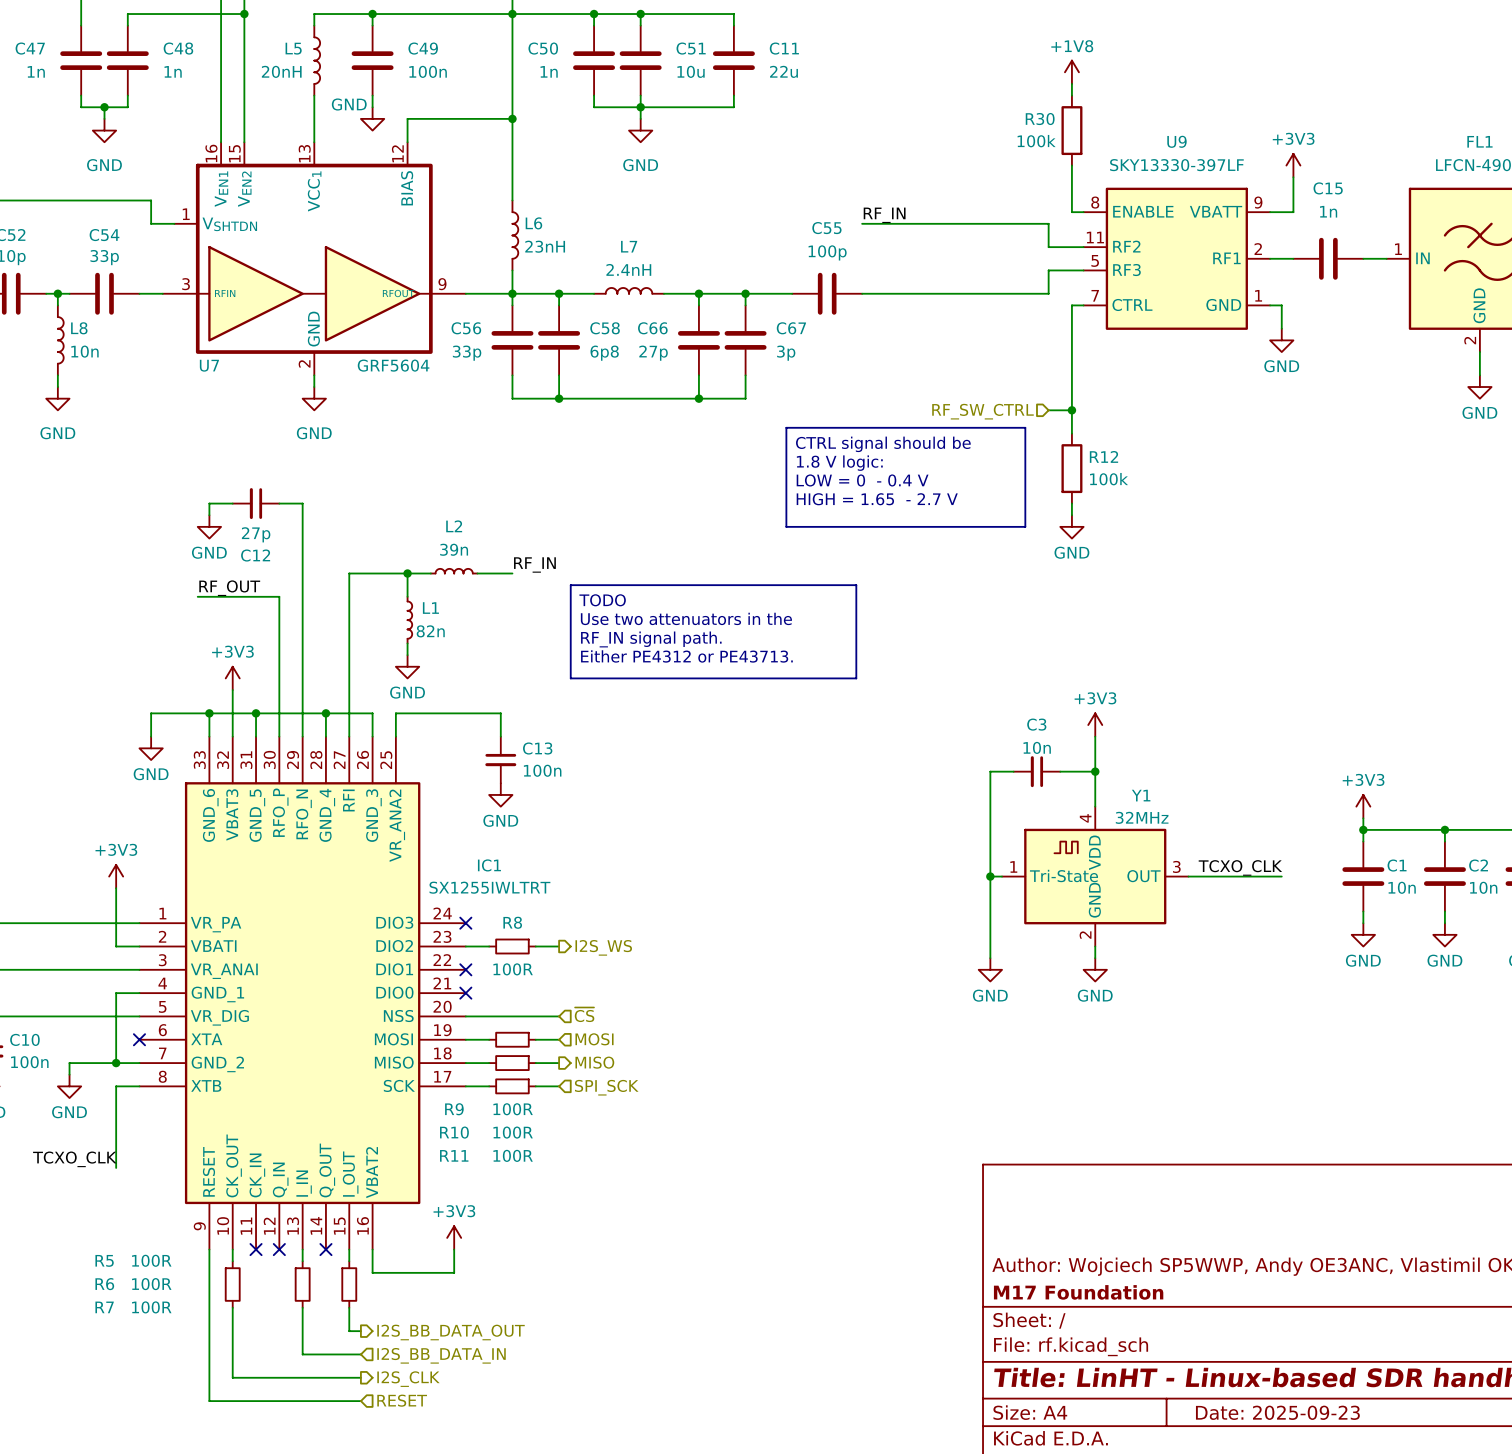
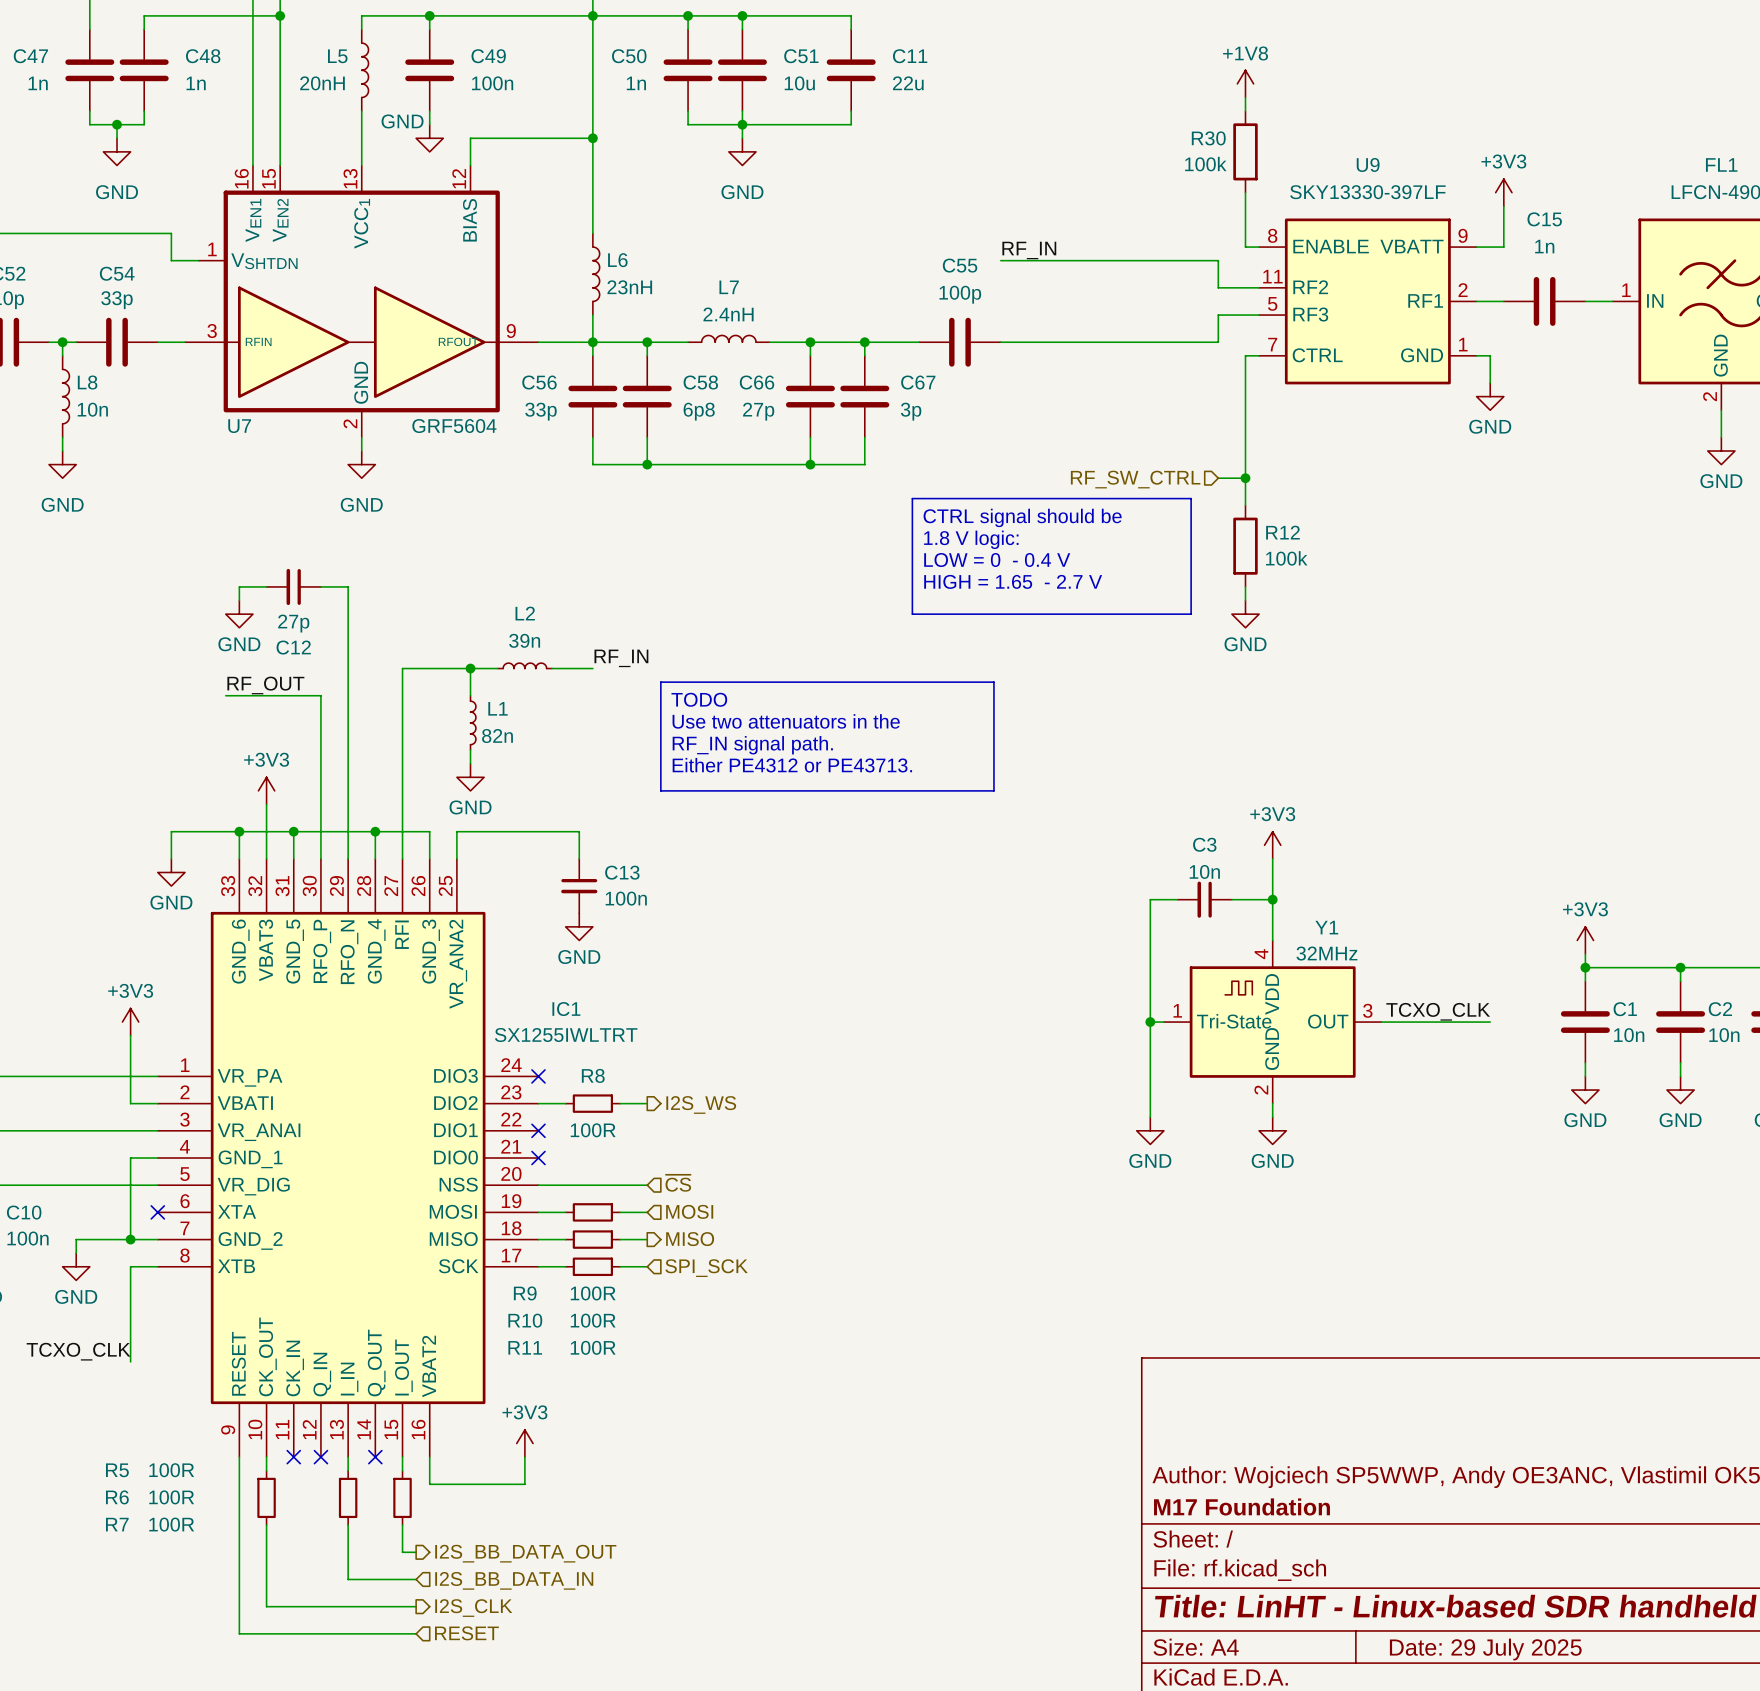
title block: Date: 2025-09-23 (1277, 1412) -> Date: 29 July 2025 (1485, 1649)

